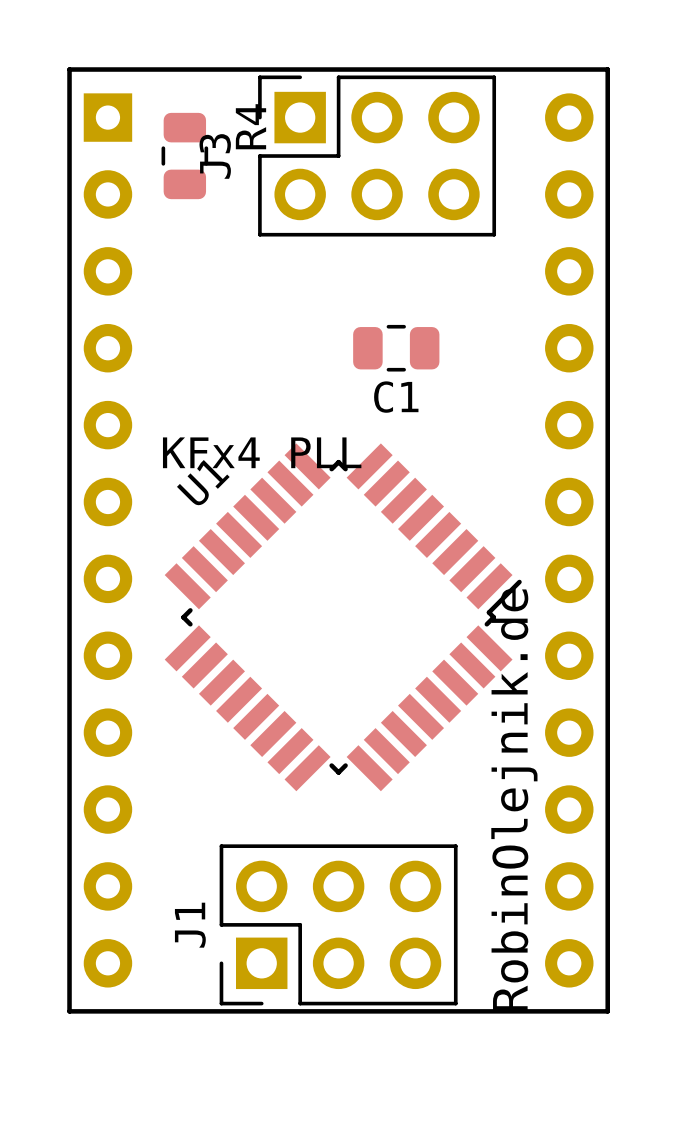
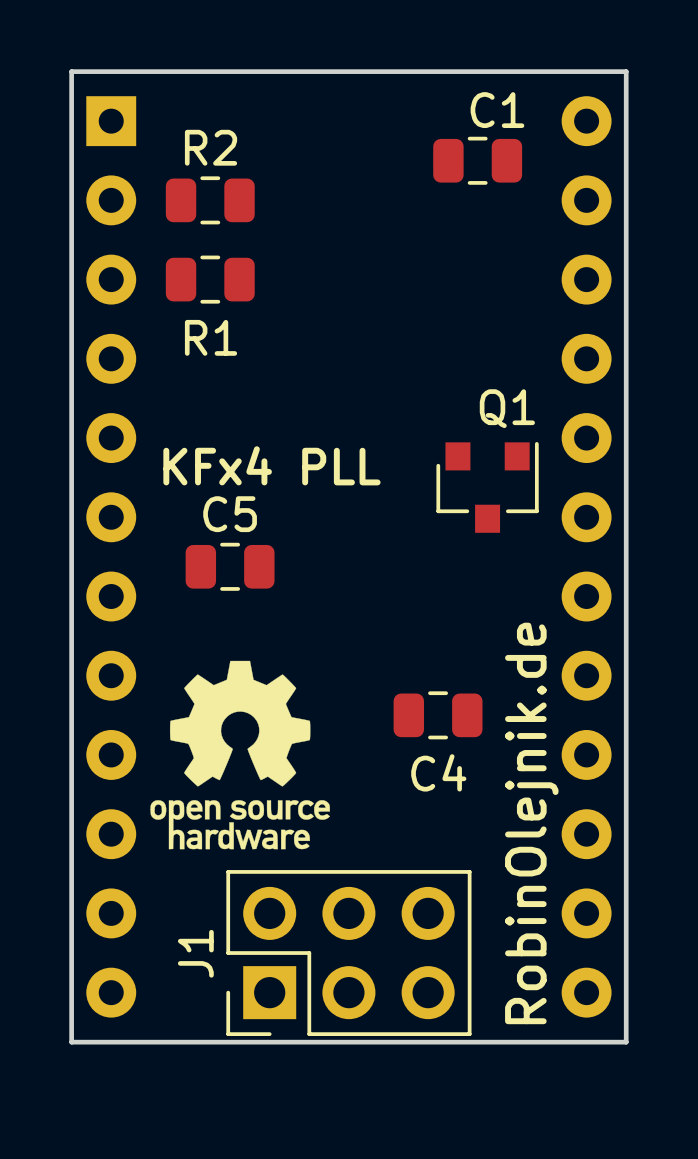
R4: (184, 156) -> none
J3: (377, 156) -> none
R2: none -> (210, 200)
R1: none -> (210, 279)
C1 position: (396, 348) -> (477, 160)
C1 name position: C1 (396, 397) -> C1 (497, 110)
Q1: none -> (487, 487)
C5: none -> (230, 566)
U1: (343, 617) -> none
drawing: none -> [150, 660, 330, 850]
C4: none -> (438, 715)

